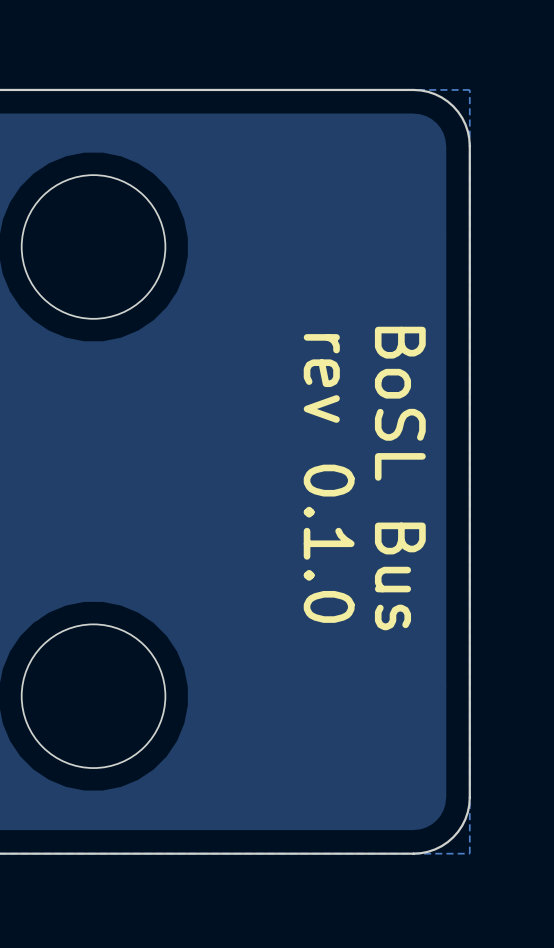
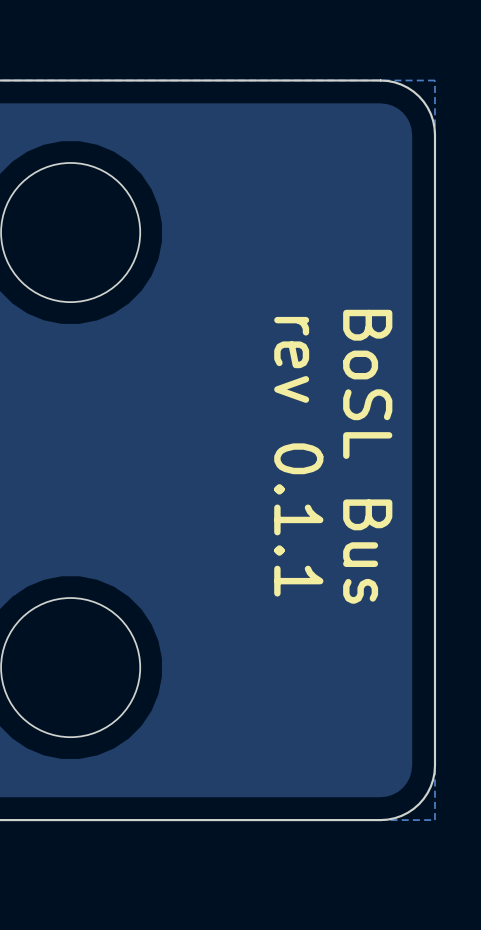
text: rev 0.1.0 (329, 478) -> rev 0.1.1 (298, 456)

